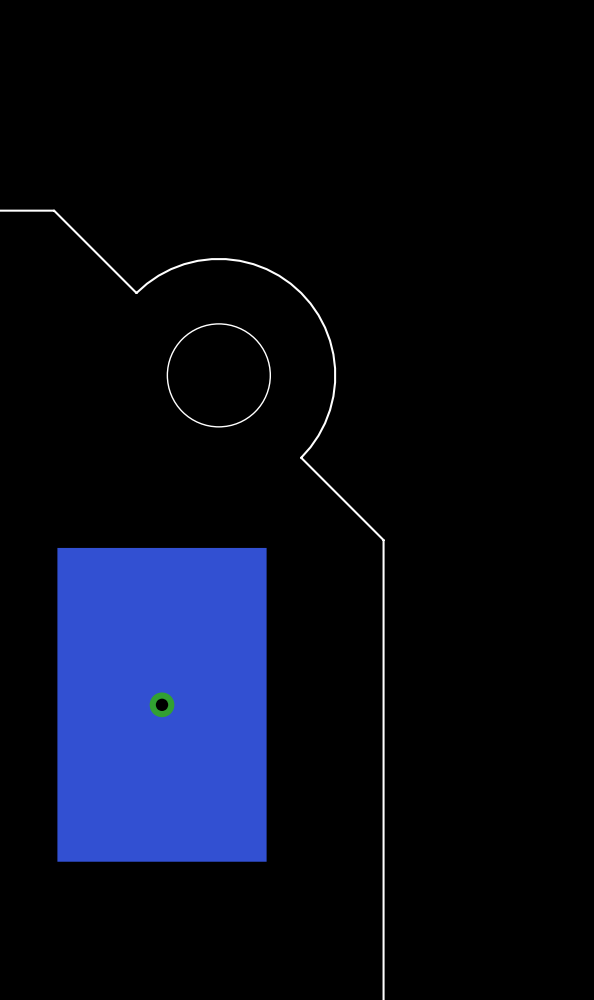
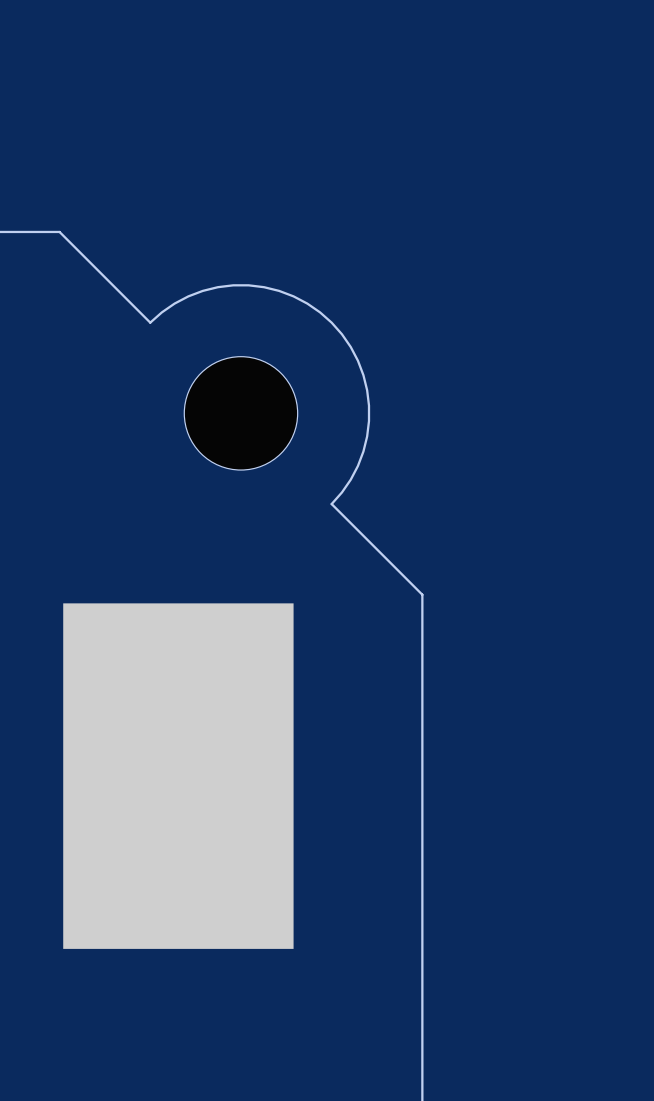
via: (162, 704) -> none

